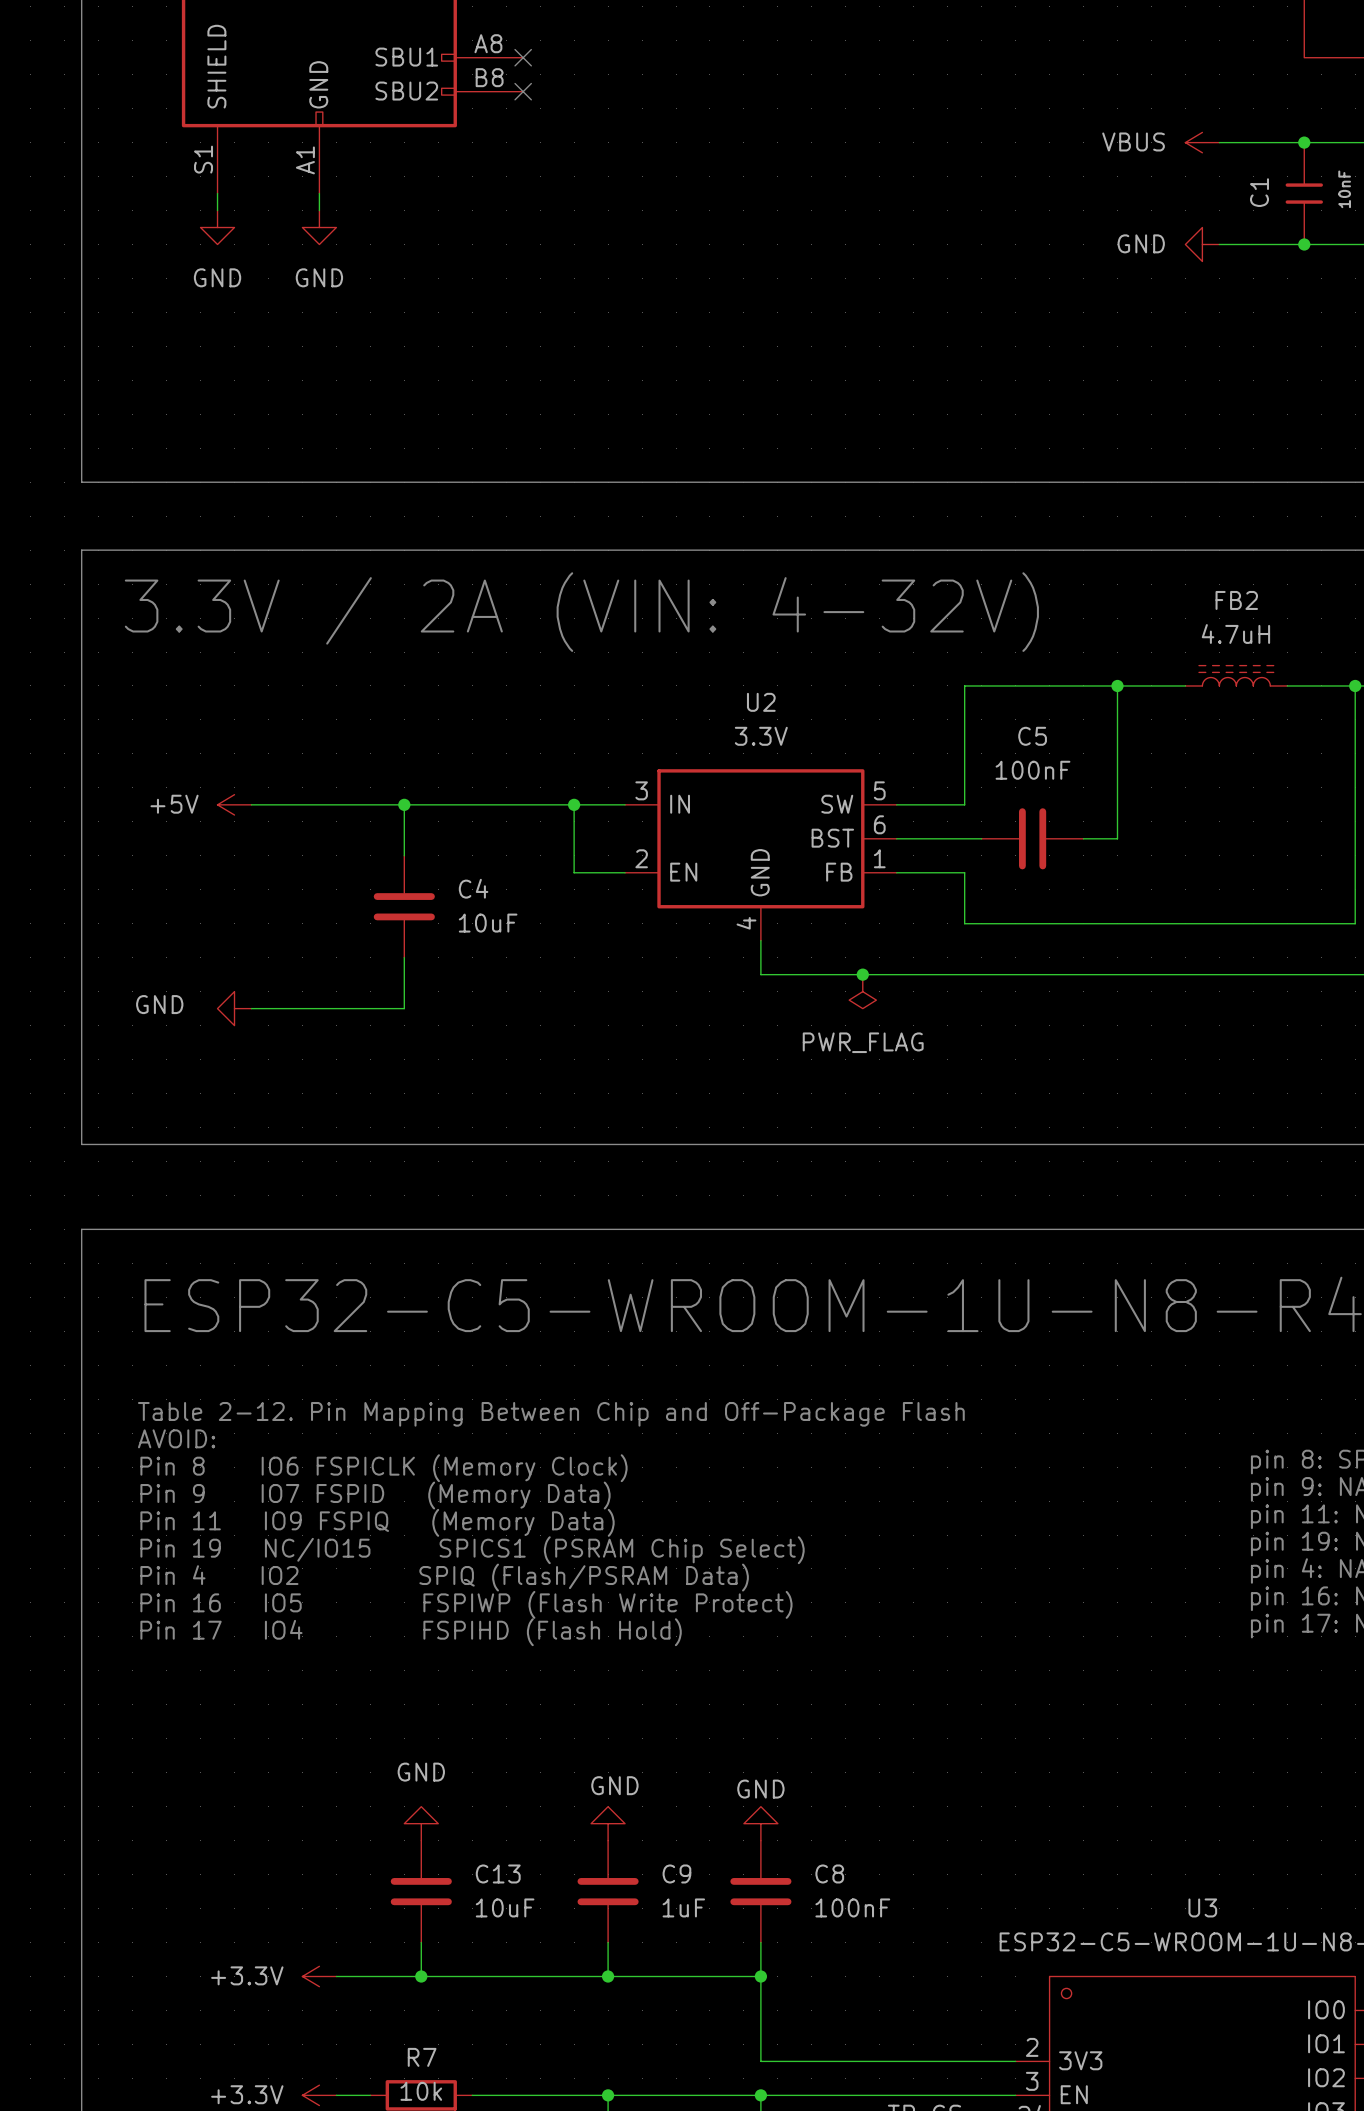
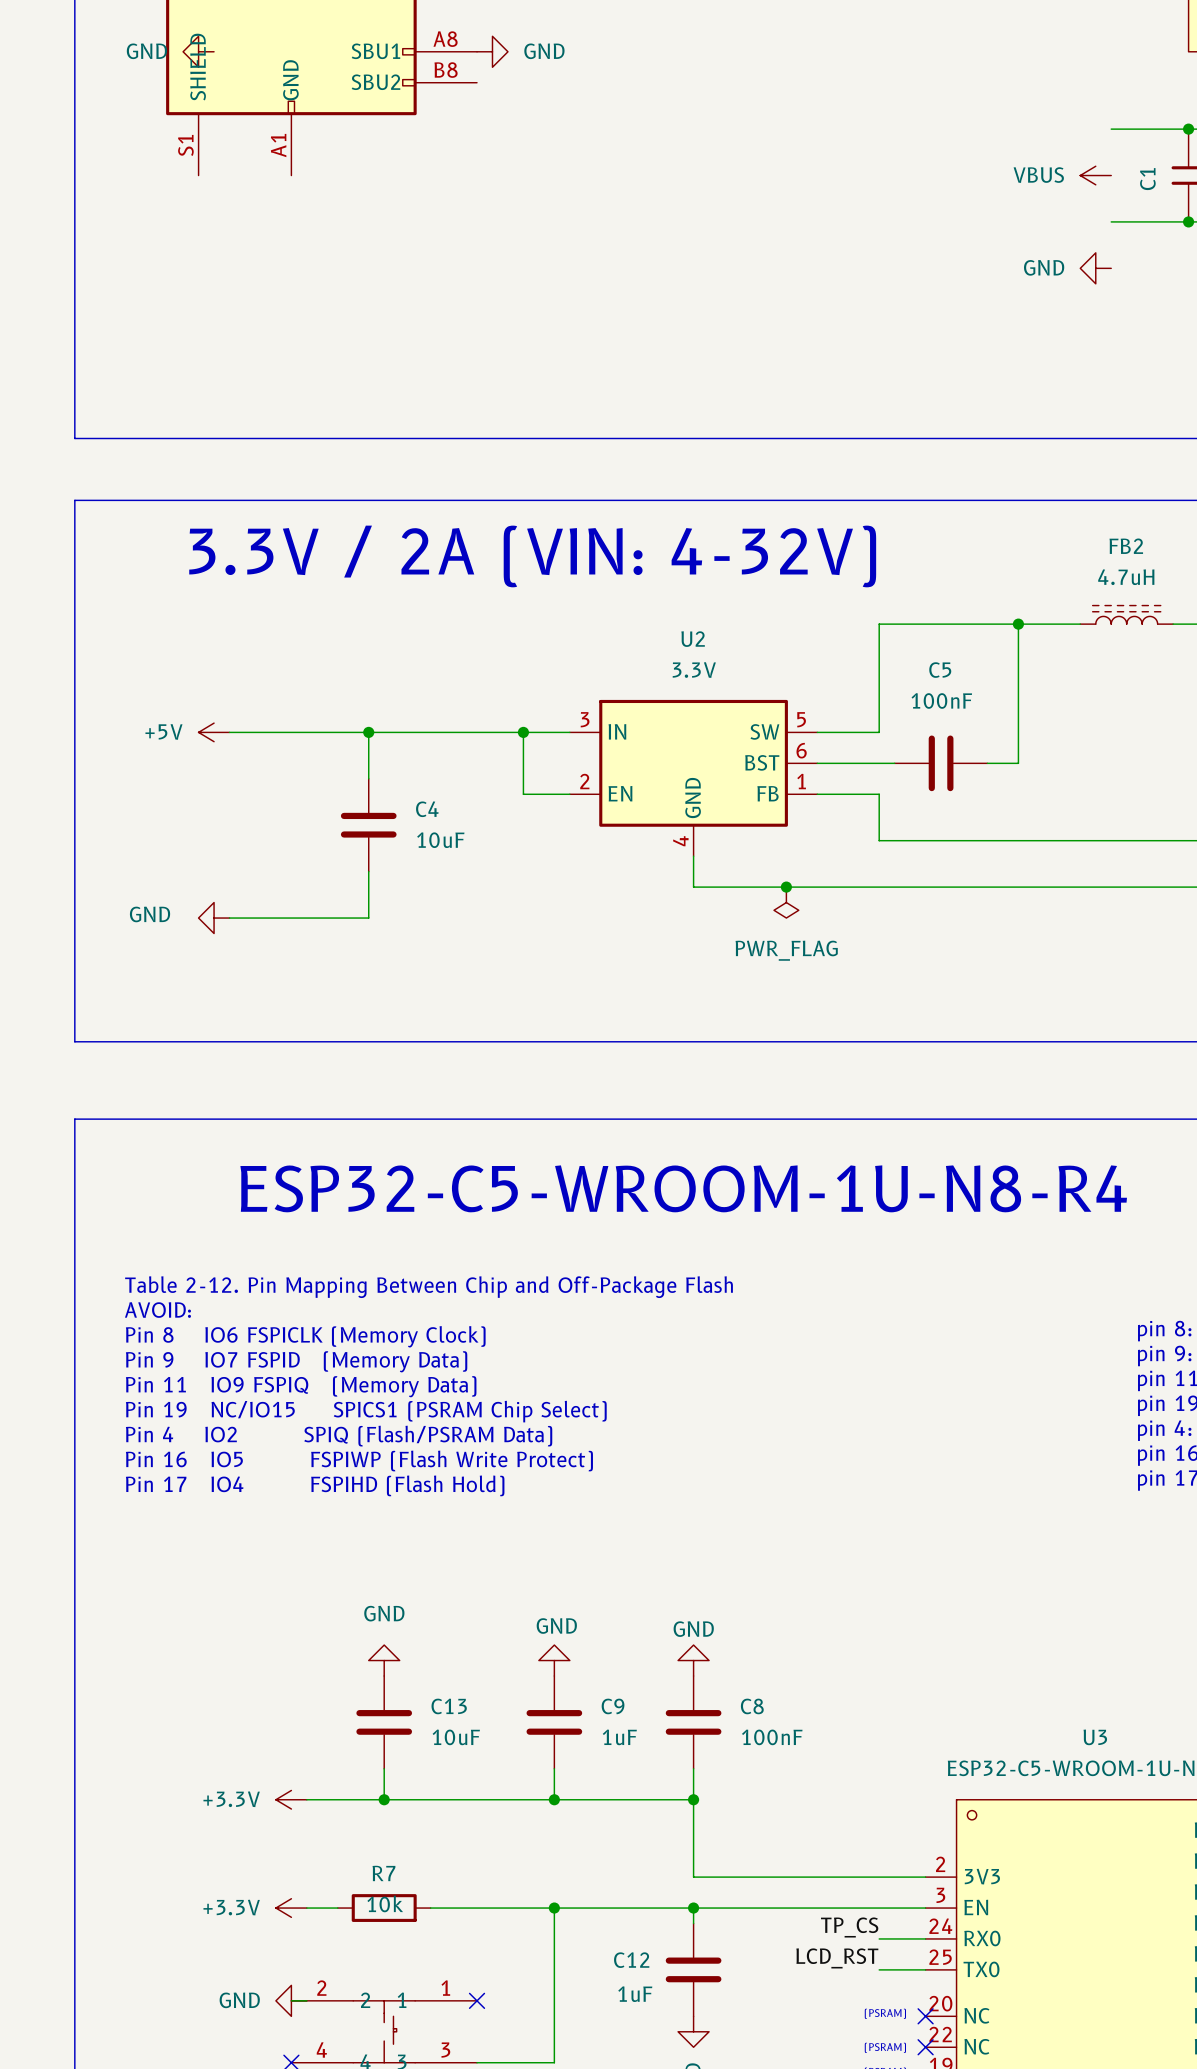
power symbol: none -> GND (198, 51)
no-connect mark: (523, 57) -> none
power symbol: none -> GND (492, 51)
no-connect mark: (523, 91) -> none
power symbol position: VBUS (1202, 142) -> VBUS (1095, 175)
wire: (217, 193) (217, 210) -> none
wire: (319, 193) (319, 210) -> none
power symbol: GND (217, 227) -> none
power symbol: GND (319, 227) -> none
power symbol position: GND (1202, 244) -> GND (1095, 268)

